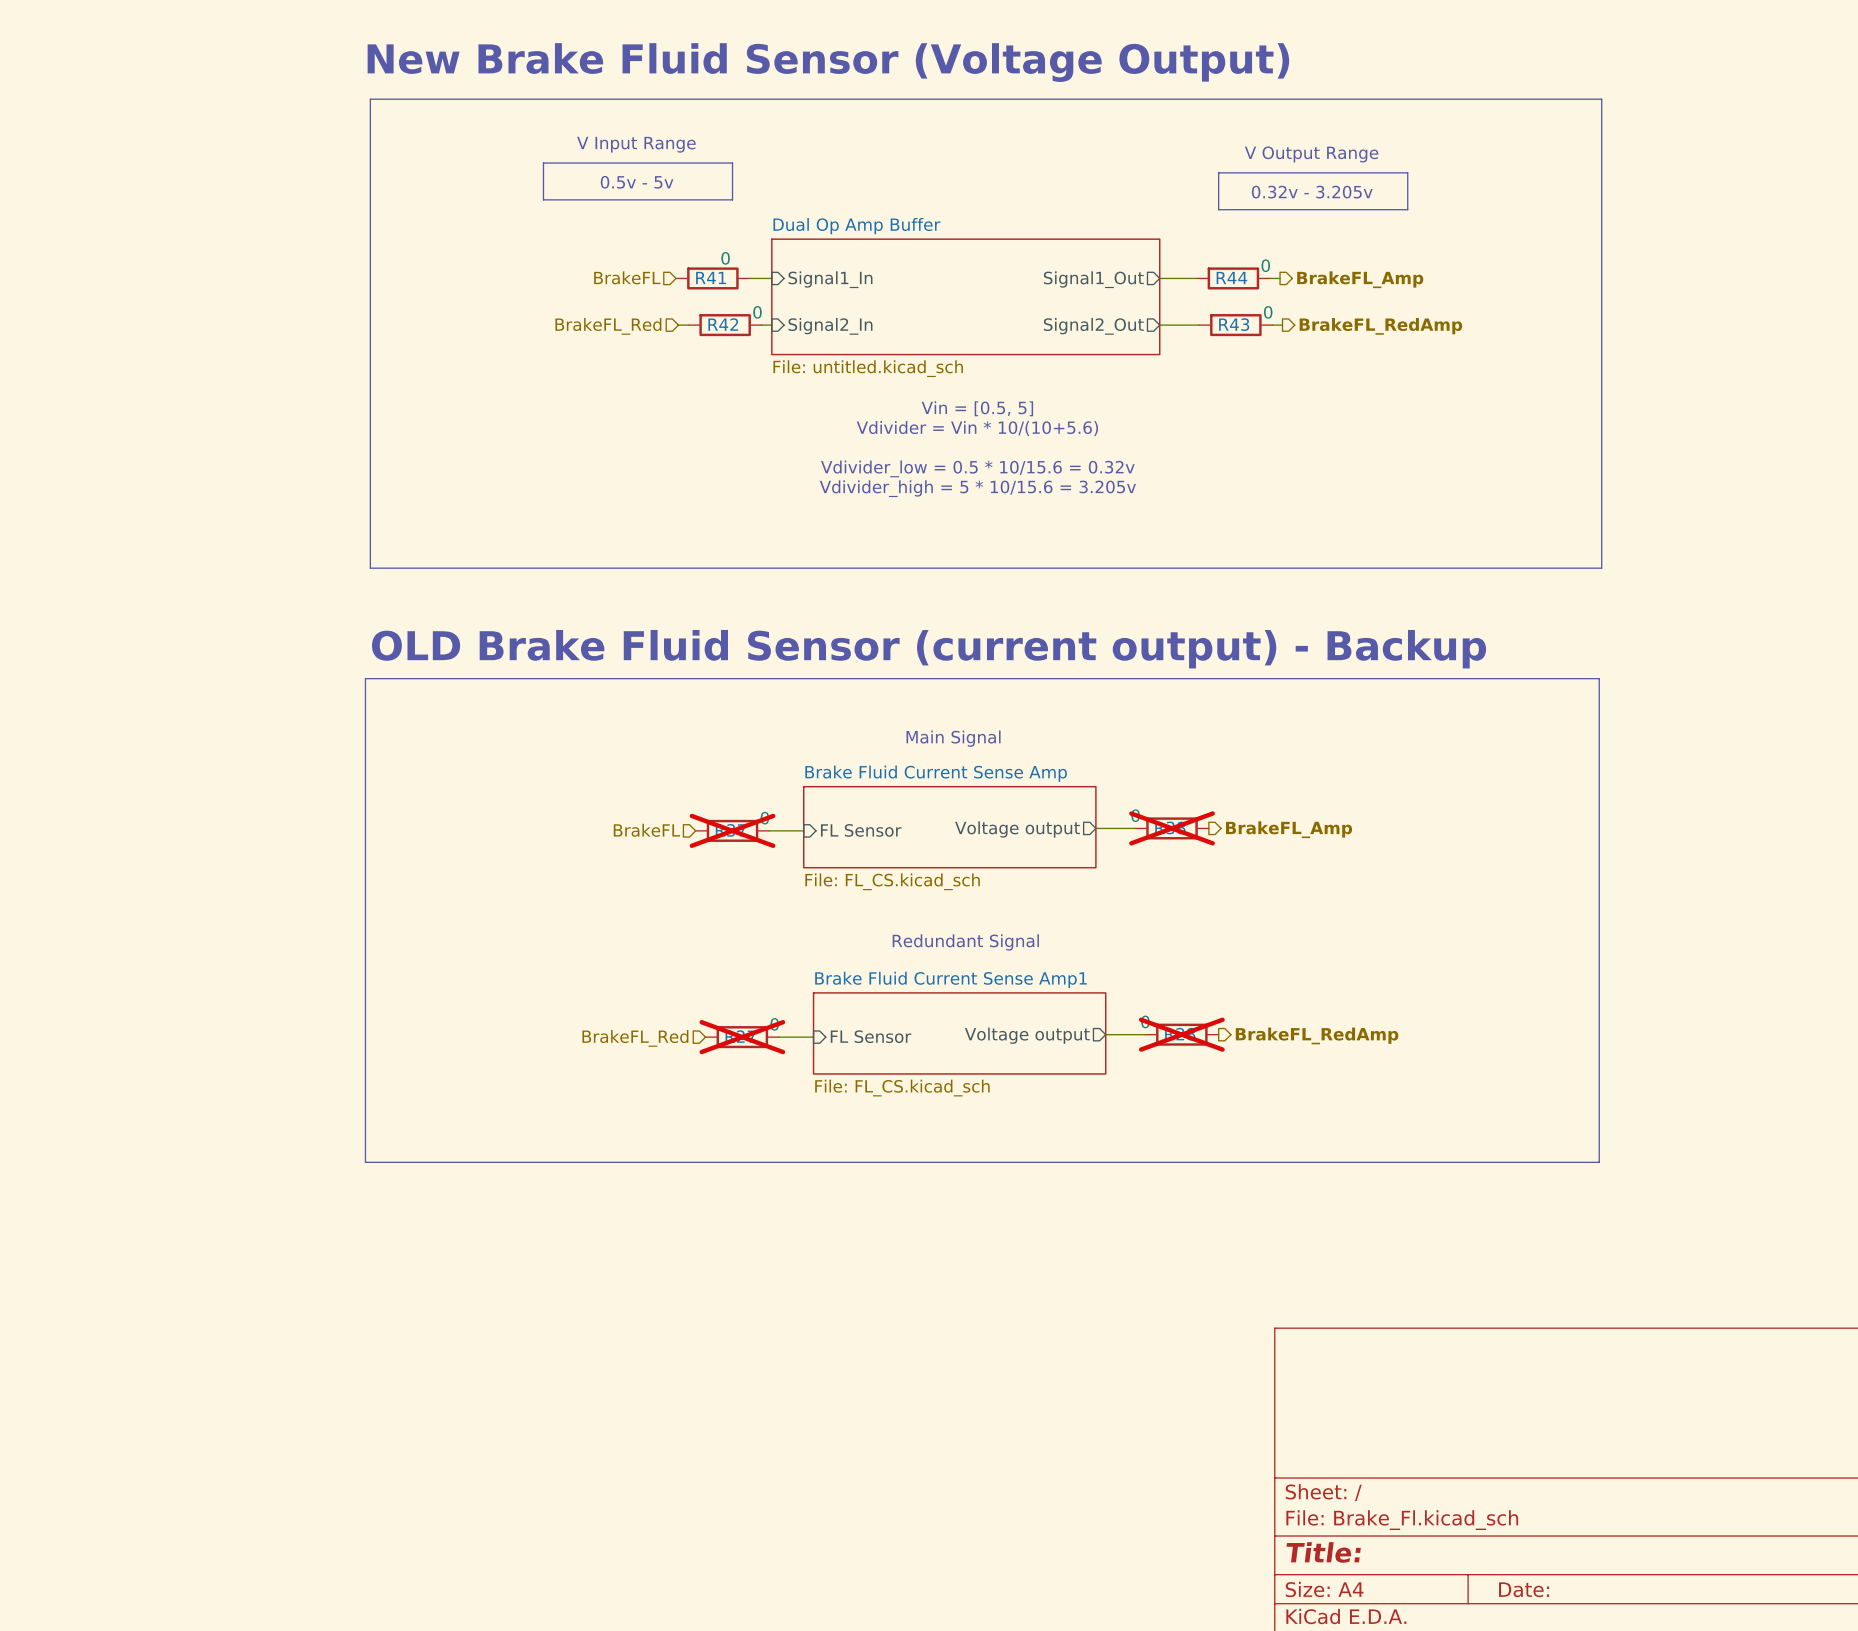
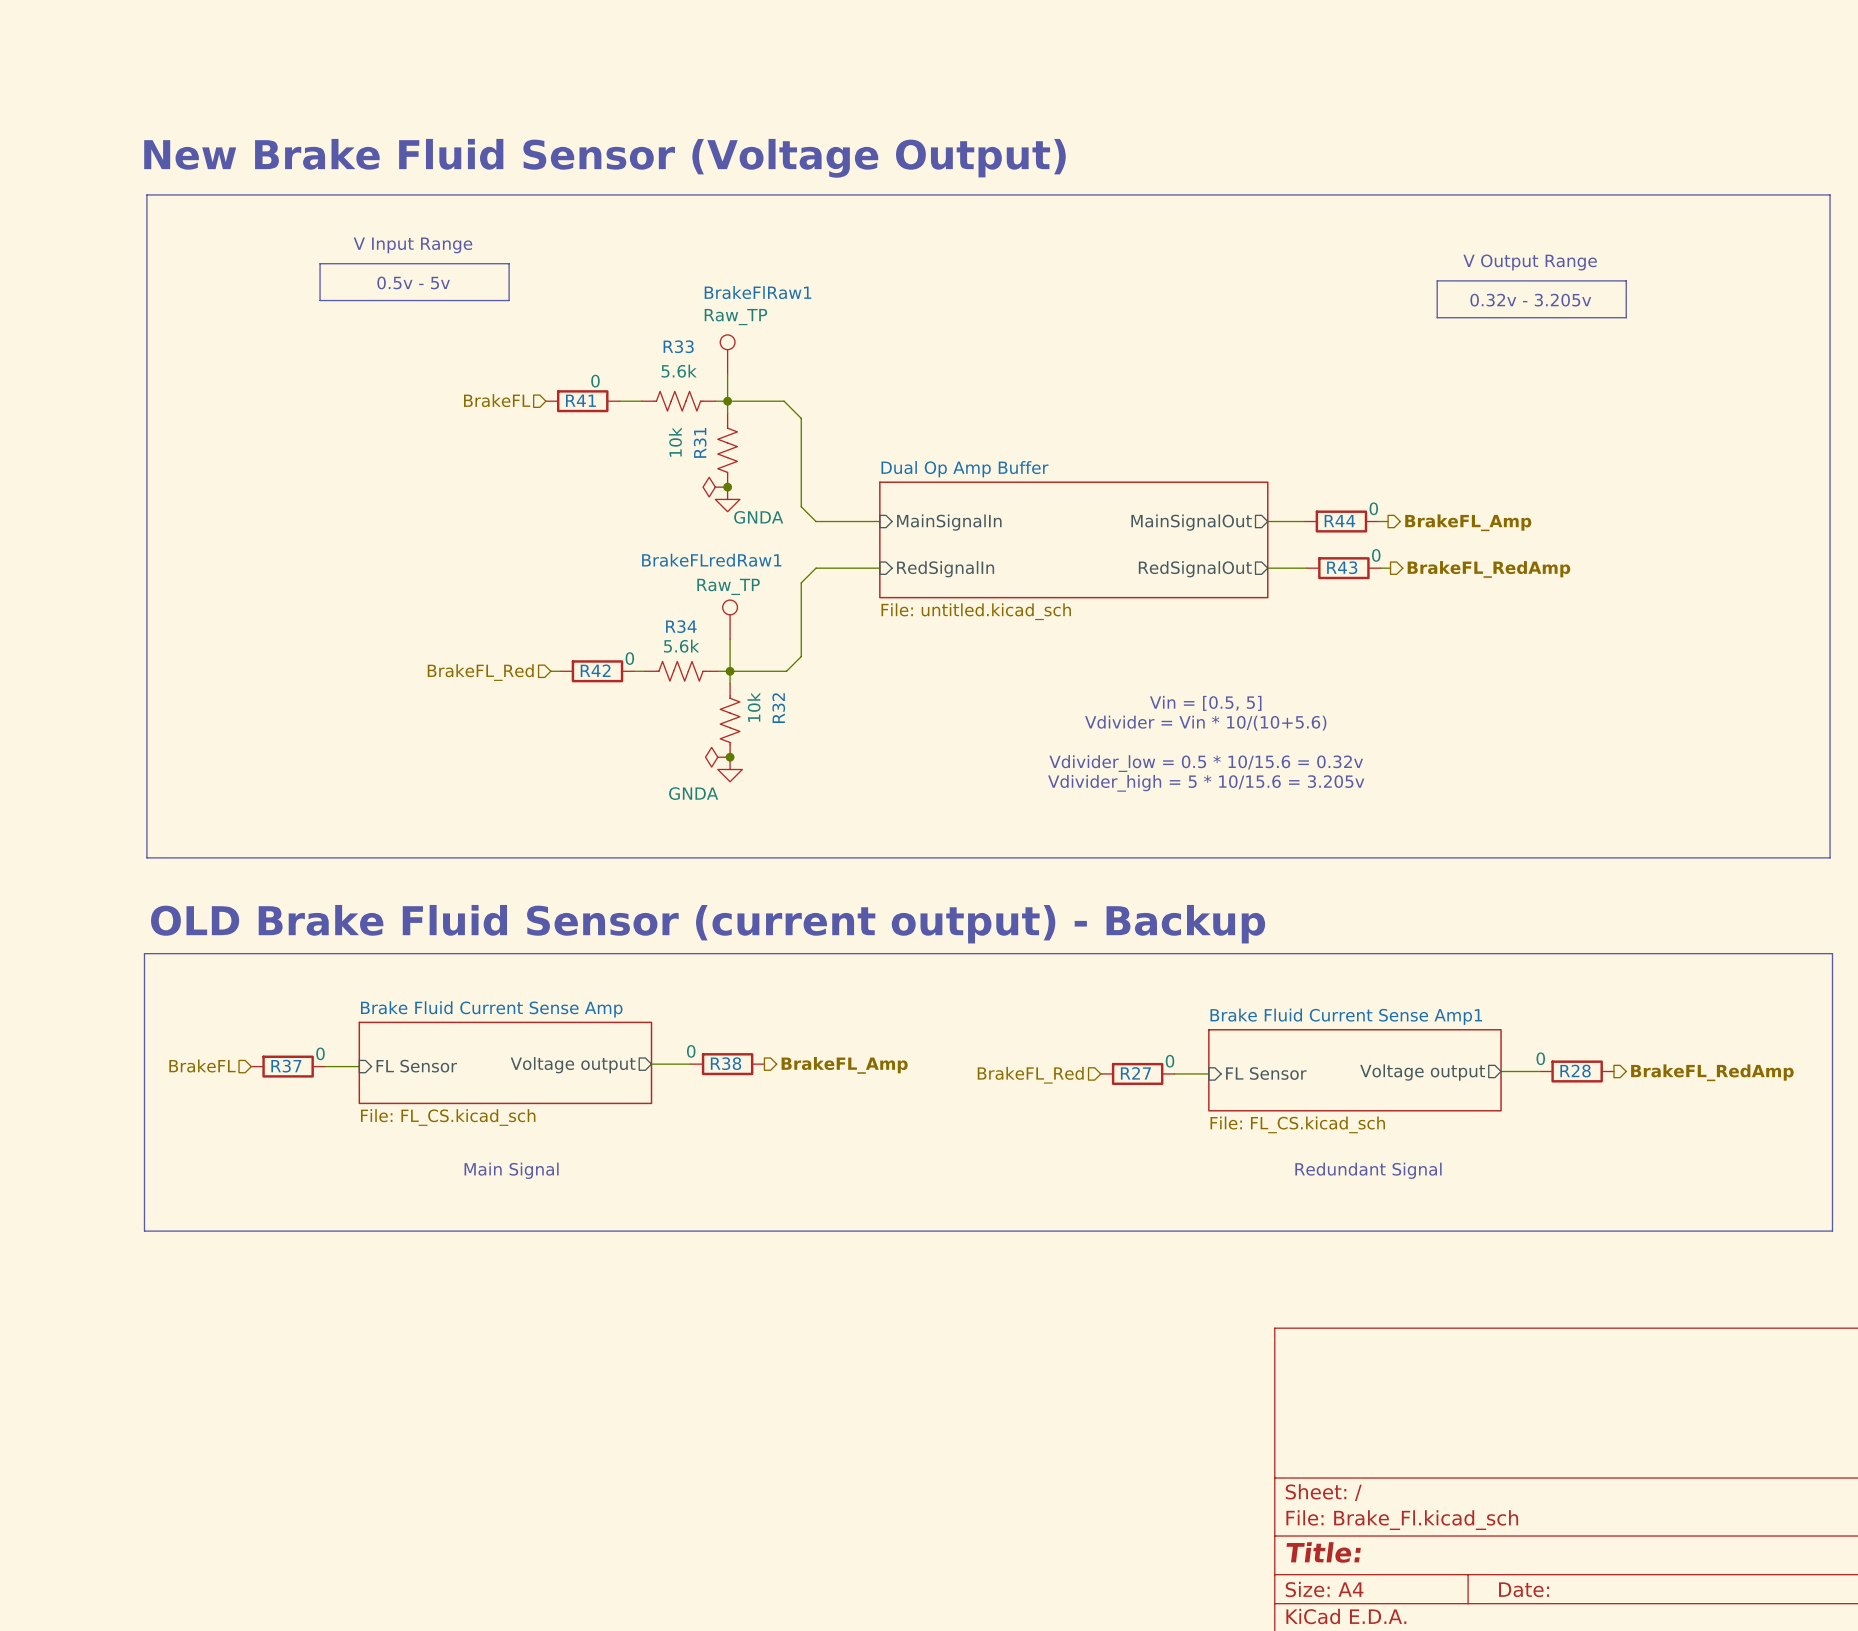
text: New Brake Fluid Sensor (Voltage Output) (828, 62) -> none
line: (370, 99) (1601, 99) (1601, 568) (370, 568) (370, 99) -> none
text: V Input Range (636, 144) -> none
text: V Output Range (1311, 154) -> none
text: none -> New Brake Fluid Sensor (Voltage Output) (604, 158)
line: (543, 163) (732, 163) (732, 199) (543, 199) (543, 163) -> none
line: (1218, 172) (1407, 172) (1407, 209) (1218, 209) (1218, 172) -> none
text: 0.5v - 5v (637, 182) -> none
text: 0.32v - 3.205v (1312, 192) -> none
line: none -> (146, 194) (1830, 194) (1830, 857) (146, 857) (146, 194)
text: none -> V Input Range (412, 245)
text: none -> V Output Range (1530, 262)
line: none -> (320, 263) (509, 263) (509, 300) (320, 300) (320, 263)
hierarchical label position: BrakeFL (627, 277) -> BrakeFL (497, 400)
R41 position: (712, 278) -> (582, 401)
wire: (749, 278) (771, 278) -> (619, 401) (641, 401)
wire: (1159, 278) (1196, 278) -> none
R44 position: (1233, 278) -> (1341, 521)
wire: (1270, 278) (1280, 278) -> none
sheet pin: Signal1_In (830, 279) -> none
sheet pin: Signal1_Out (1093, 279) -> none
hierarchical label: BrakeFL_Amp (1360, 279) -> none
line: none -> (1437, 280) (1626, 280) (1626, 317) (1437, 317) (1437, 280)
text: none -> 0.5v - 5v (413, 282)
sheet Dual Op Amp Buffer: File: untitled.kicad_sch (965, 296) -> none
text: none -> 0.32v - 3.205v (1530, 300)
wire: (678, 325) (688, 325) -> none
R42 position: (725, 325) -> (597, 671)
wire: (761, 325) (771, 325) -> none
wire: (1159, 325) (1199, 325) -> none
R43 position: (1235, 325) -> (1343, 568)
wire: (1272, 325) (1282, 325) -> (1378, 521) (1388, 521)
hierarchical label: BrakeFL_Red (608, 326) -> none
sheet pin: Signal2_In (830, 326) -> none
sheet pin: Signal2_Out (1093, 326) -> none
hierarchical label: BrakeFL_RedAmp (1380, 326) -> none
BrakeFlRaw1: none -> Raw_TP (727, 354)
wire: none -> (727, 374) (727, 413)
R33: none -> 5.6k (678, 401)
wire: none -> (715, 401) (727, 401)
junction: none -> (727, 401)
wire: none -> (732, 401) (784, 401) (801, 418) (801, 506) (816, 521) (879, 521)
text: Vin = [0.5, 5] (977, 408) -> none
text: Vdivider = Vin * 10/(10+5.6) (977, 428) -> none
R31: none -> 10k (727, 450)
text: Vdivider_low = 0.5 * 10/15.6 = 0.32v (977, 468) -> none
power symbol: none -> (715, 487)
junction: none -> (727, 487)
text: Vdivider_high = 5 * 10/15.6 = 3.205v (977, 488) -> none
power symbol: none -> GNDA (727, 499)
wire: none -> (1267, 521) (1304, 521)
sheet pin: none -> MainSignalIn (949, 522)
sheet pin: none -> MainSignalOut (1191, 522)
hierarchical label: none -> BrakeFL_Amp (1468, 522)
sheet Dual Op Amp Buffer: none -> File: untitled.kicad_sch (1073, 539)
wire: none -> (879, 568) (816, 568) (801, 582) (801, 656) (786, 671) (732, 671)
sheet pin: none -> RedSignalIn (945, 569)
sheet pin: none -> RedSignalOut (1195, 569)
hierarchical label: none -> BrakeFL_RedAmp (1488, 569)
BrakeFLredRaw1: none -> Raw_TP (730, 619)
wire: none -> (730, 639) (730, 683)
text: OLD Brake Fluid Sensor (current output) - Backup (929, 649) -> none
wire: none -> (550, 671) (560, 671)
wire: none -> (634, 671) (644, 671)
R34: none -> 5.6k (680, 671)
wire: none -> (717, 671) (730, 671)
junction: none -> (730, 671)
hierarchical label: none -> BrakeFL_Red (480, 672)
line: (365, 678) (1599, 678) (1599, 1162) (365, 1162) (365, 678) -> none
text: none -> Vin = [0.5, 5] (1205, 703)
R32: none -> 10k (730, 720)
text: none -> Vdivider = Vin * 10/(10+5.6) (1205, 723)
text: Main Signal (953, 738) -> none
power symbol: none -> (717, 757)
junction: none -> (730, 757)
text: none -> Vdivider_low = 0.5 * 10/15.6 = 0.32v (1206, 763)
power symbol: none -> GNDA (730, 769)
text: none -> Vdivider_high = 5 * 10/15.6 = 3.205v (1206, 783)
sheet Brake Fluid Current Sense Amp: File: FL_CS.kicad_sch (949, 827) -> none
wire: (1095, 828) (1135, 828) -> none
R38 position: (1172, 828) -> (727, 1064)
R38 do-not-place cross: (1172, 828) -> none
sheet pin: Voltage output (1017, 829) -> none
hierarchical label: BrakeFL_Amp (1289, 829) -> none
hierarchical label: BrakeFL (646, 830) -> none
R37 position: (732, 830) -> (288, 1066)
R37 do-not-place cross: (732, 830) -> none
wire: (769, 830) (803, 830) -> none
sheet pin: FL Sensor (861, 830) -> none
text: none -> OLD Brake Fluid Sensor (current output) - Backup (708, 924)
text: Redundant Signal (965, 942) -> none
line: none -> (144, 953) (1832, 953) (1832, 1231) (144, 1231) (144, 953)
sheet Brake Fluid Current Sense Amp1 position: (959, 1033) -> (1354, 1070)
wire: (1105, 1034) (1145, 1034) -> none
R28 position: (1181, 1034) -> (1577, 1071)
R28 do-not-place cross: (1181, 1034) -> none
sheet pin: Voltage output (1027, 1035) -> none
hierarchical label: BrakeFL_RedAmp (1317, 1035) -> none
sheet pin: FL Sensor (871, 1036) -> none
R27 position: (742, 1037) -> (1137, 1073)
R27 do-not-place cross: (742, 1037) -> none
wire: (779, 1037) (813, 1037) -> none
hierarchical label: BrakeFL_Red (635, 1038) -> none
sheet Brake Fluid Current Sense Amp: none -> File: FL_CS.kicad_sch (505, 1062)
wire: none -> (651, 1064) (690, 1064)
hierarchical label: none -> BrakeFL (202, 1065)
sheet pin: none -> Voltage output (573, 1065)
hierarchical label: none -> BrakeFL_Amp (844, 1065)
wire: none -> (324, 1066) (359, 1066)
sheet pin: none -> FL Sensor (416, 1066)
wire: none -> (1501, 1071) (1540, 1071)
sheet pin: none -> Voltage output (1422, 1072)
hierarchical label: none -> BrakeFL_RedAmp (1712, 1072)
wire: none -> (1174, 1073) (1208, 1073)
sheet pin: none -> FL Sensor (1266, 1073)
hierarchical label: none -> BrakeFL_Red (1030, 1075)
text: none -> Main Signal (511, 1170)
text: none -> Redundant Signal (1368, 1170)

